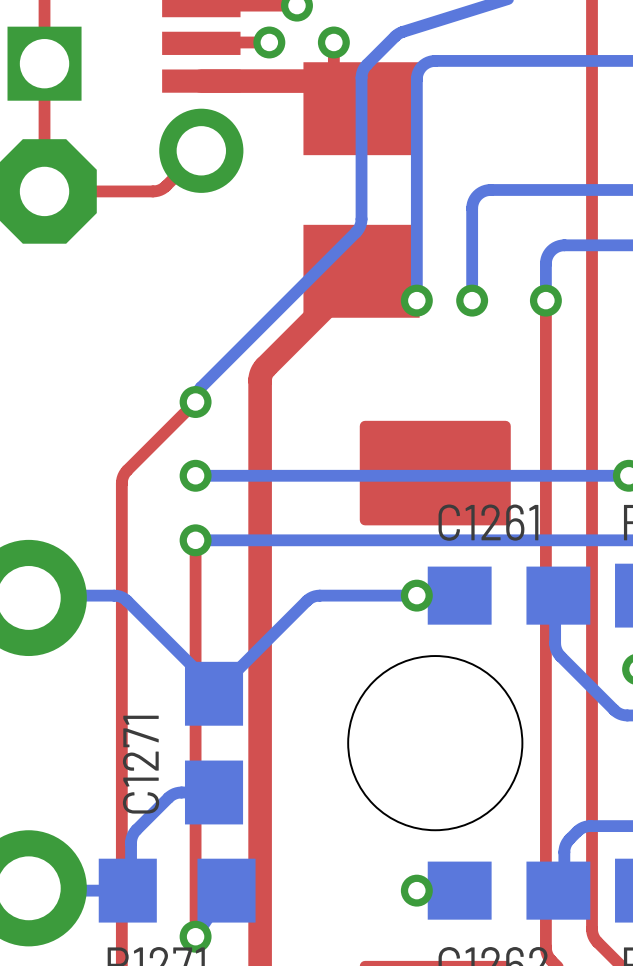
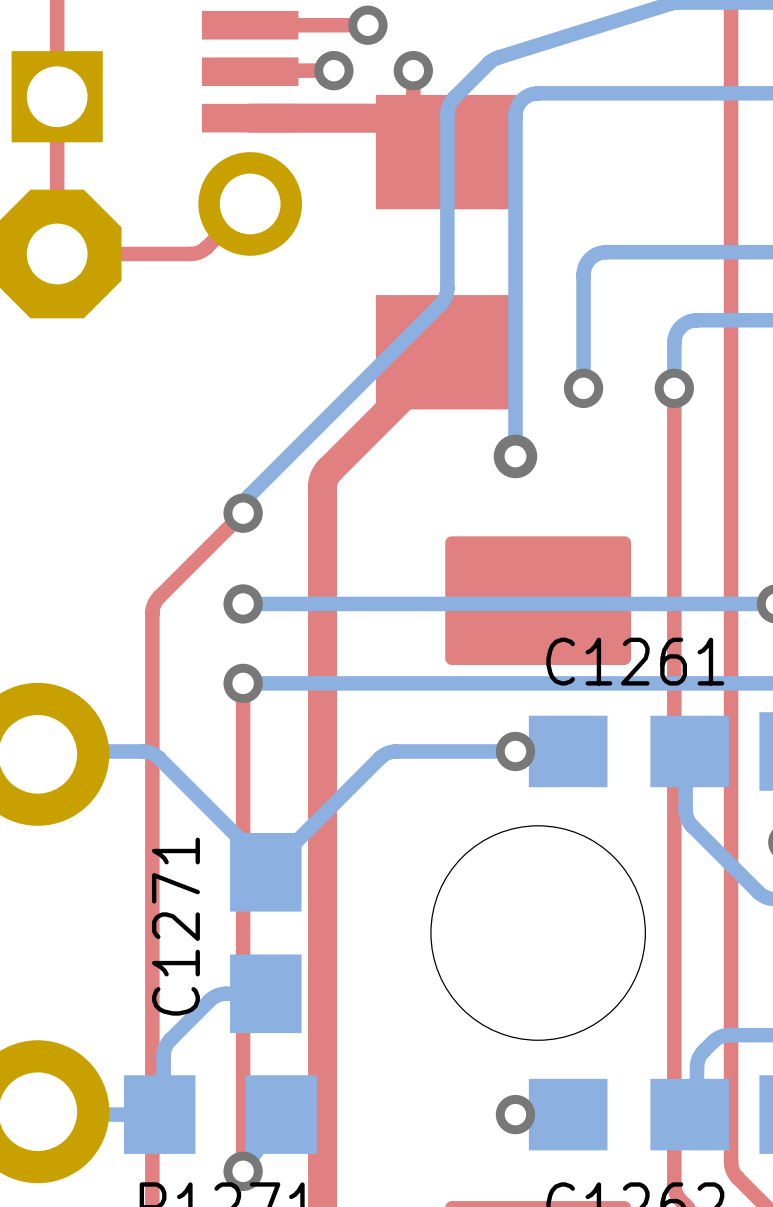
bottom track: none -> (515, 388) (515, 456)
via: (416, 300) -> none
via: none -> (515, 456)

